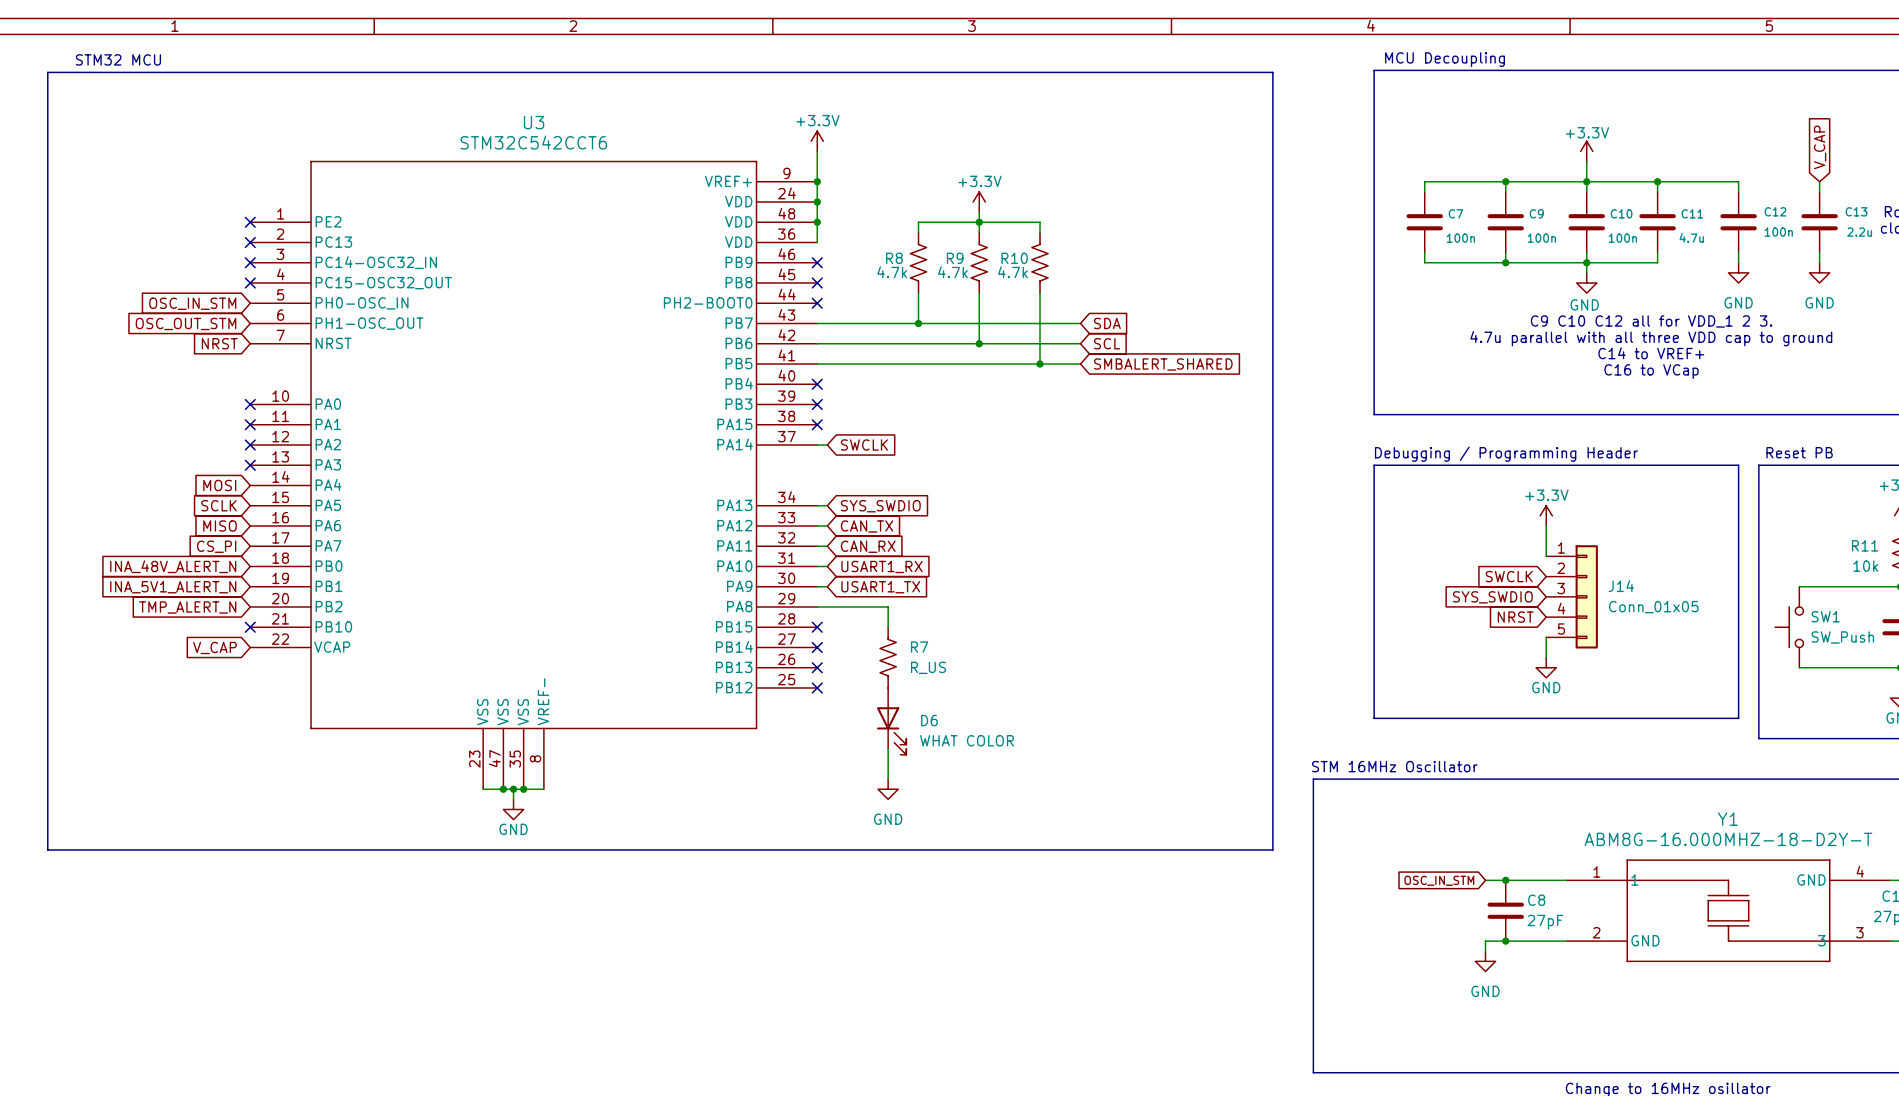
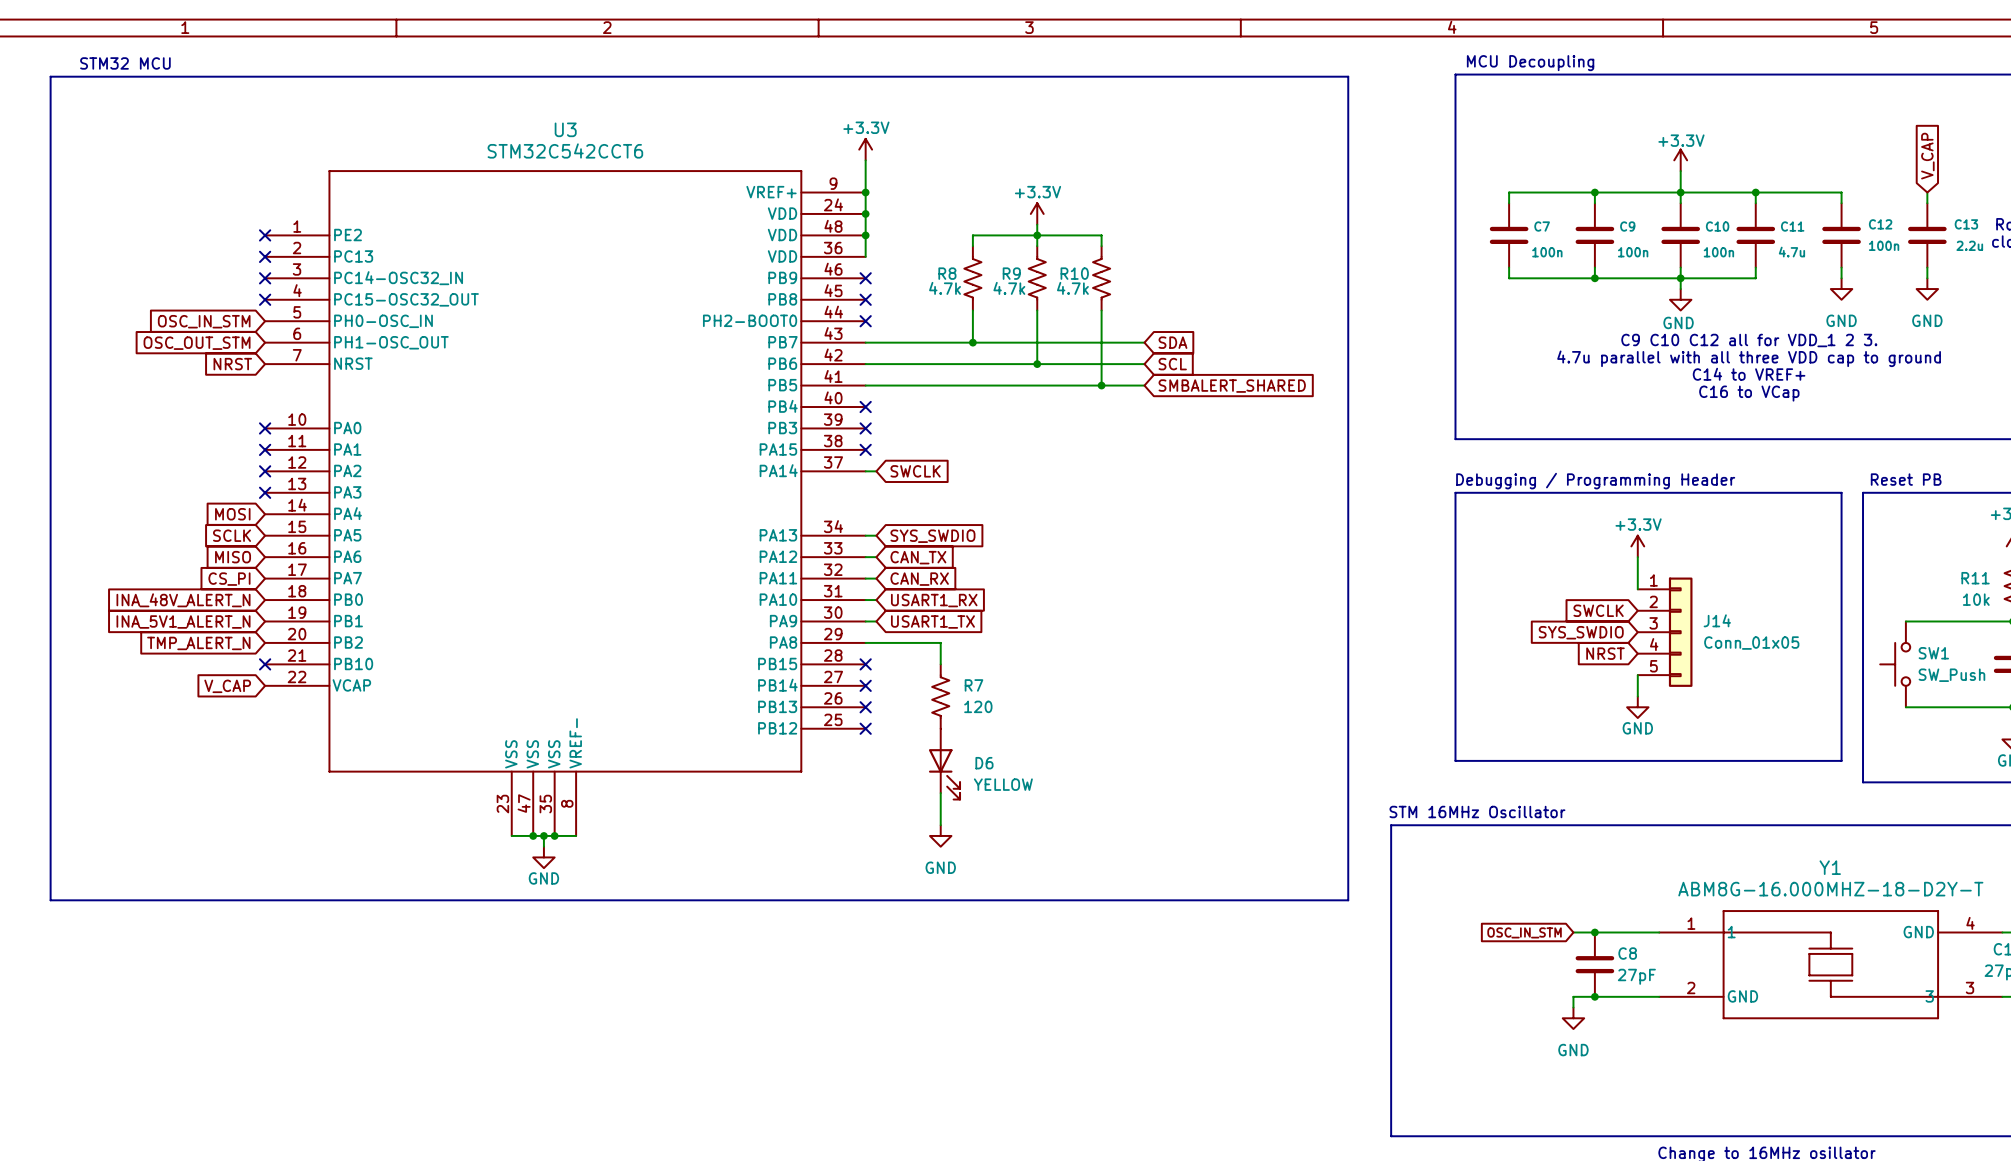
R7 value: R_US (928, 667) -> 120 (978, 706)
D6 value: WHAT COLOR (967, 740) -> YELLOW (1003, 784)

